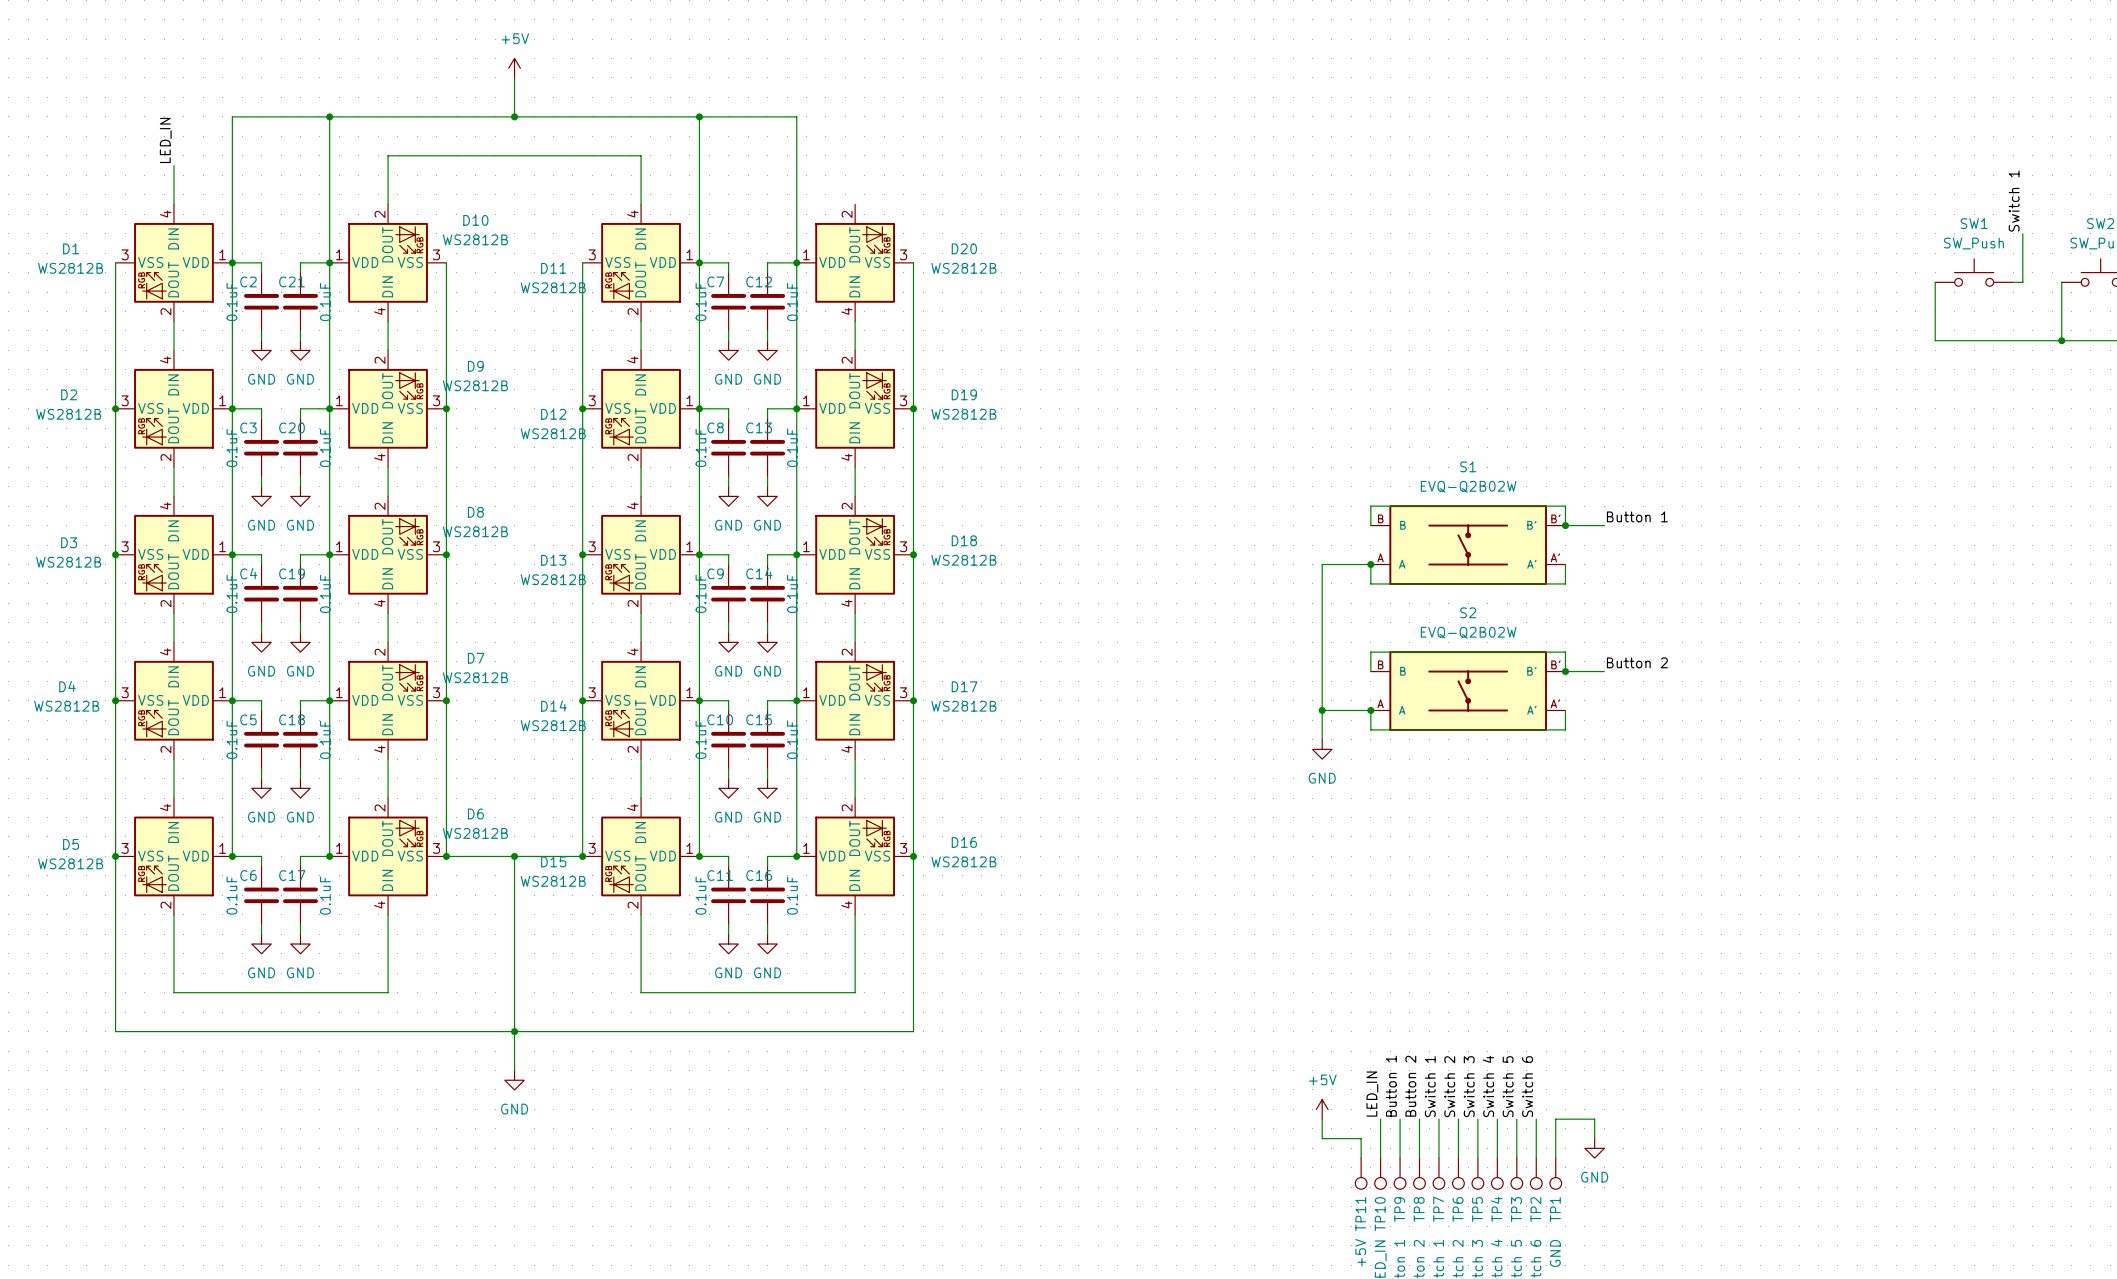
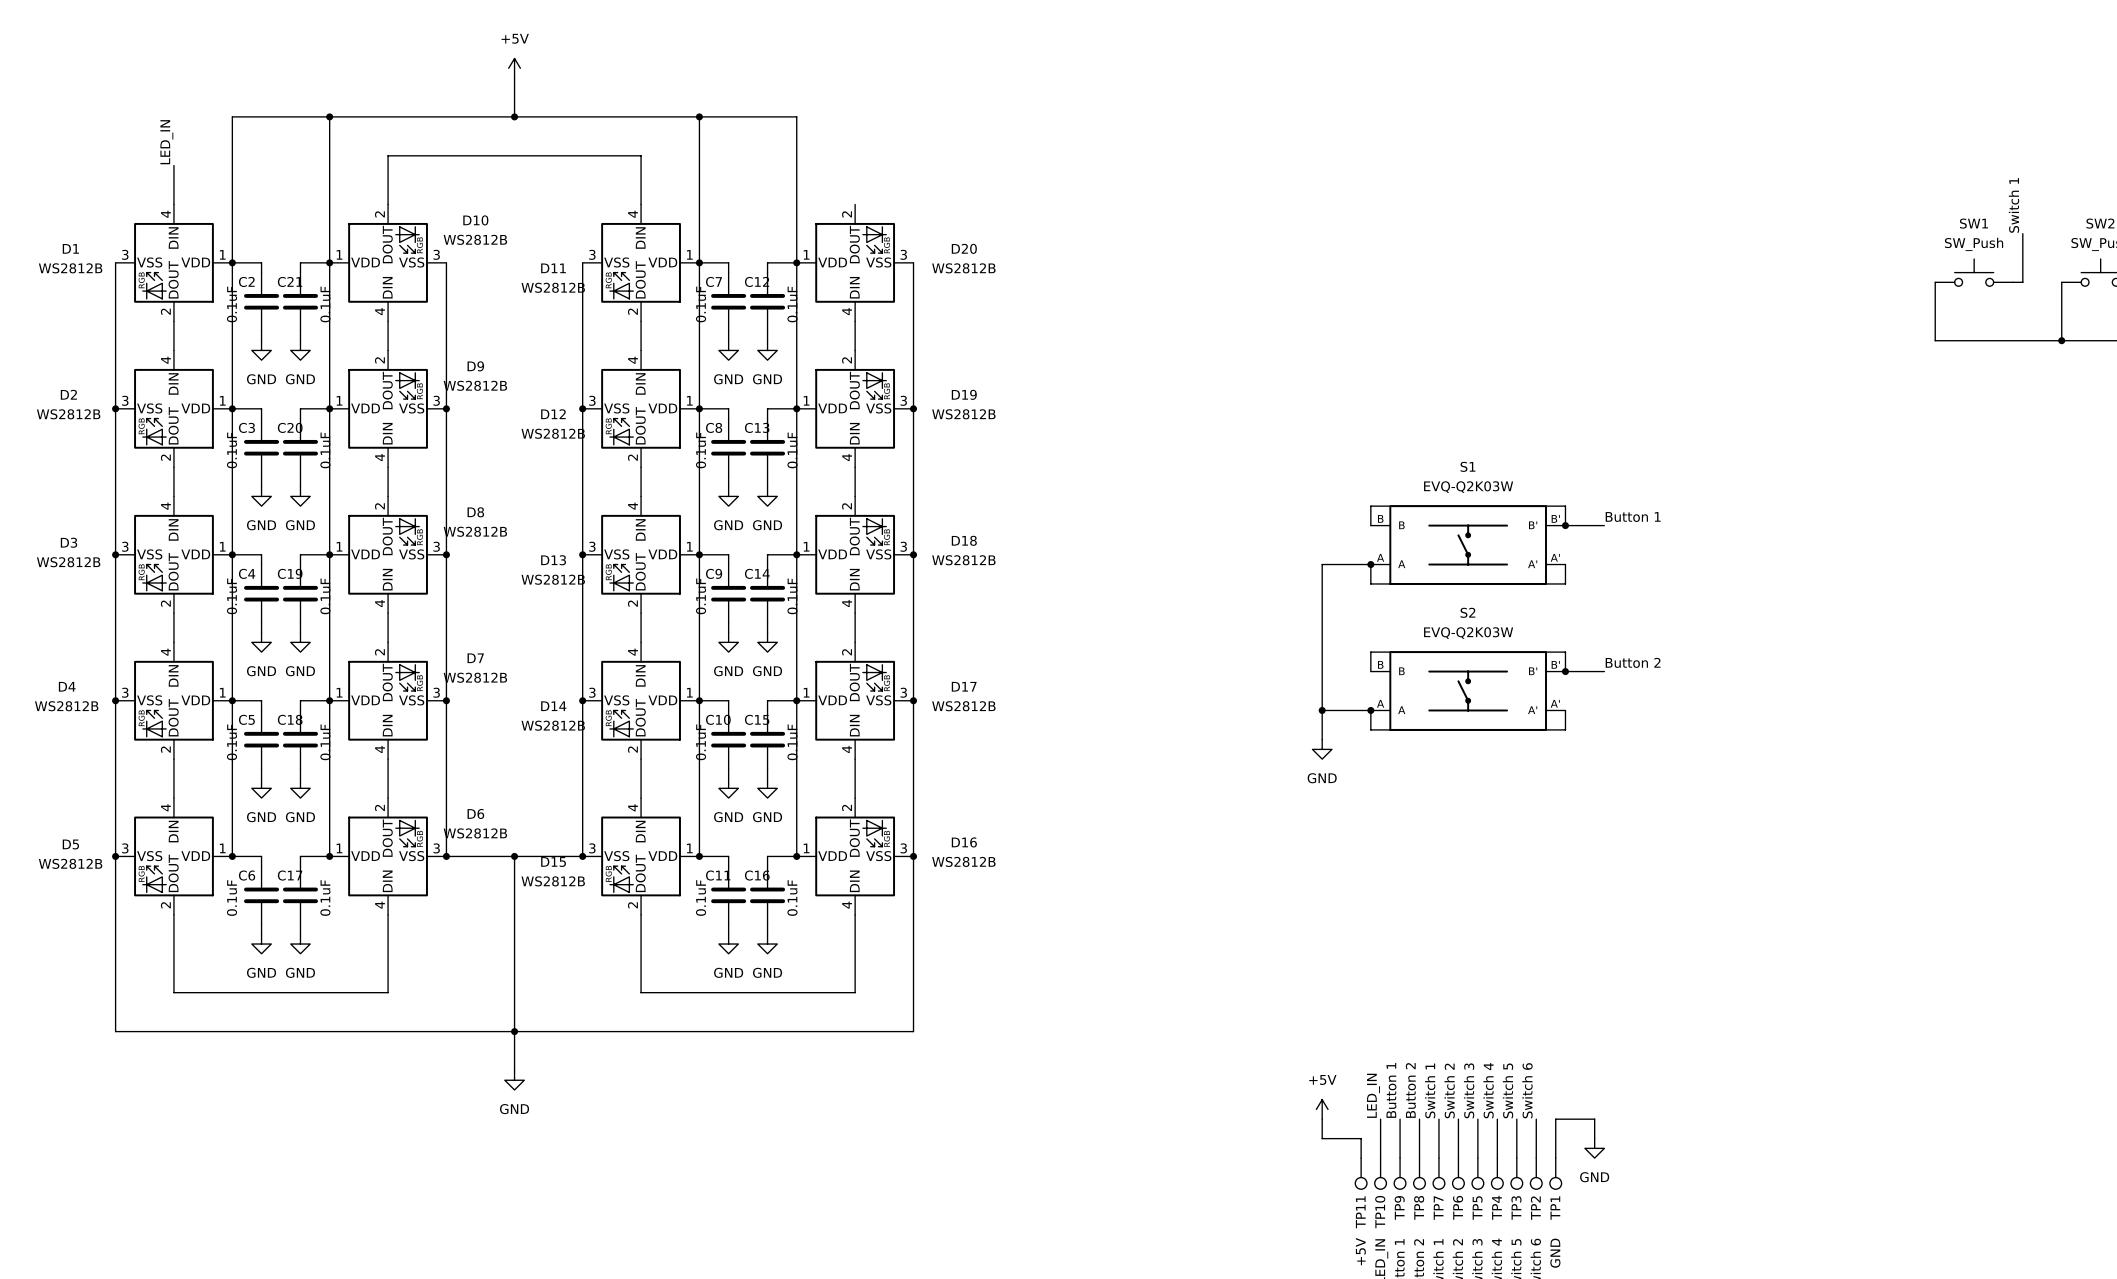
S1 value: EVQ-Q2B02W (1468, 486) -> EVQ-Q2K03W (1468, 487)
S2 value: EVQ-Q2B02W (1468, 632) -> EVQ-Q2K03W (1468, 633)

